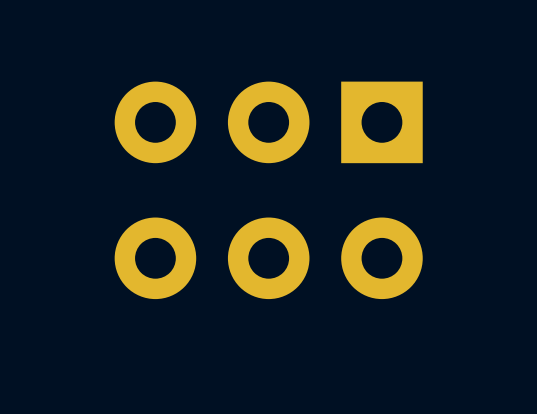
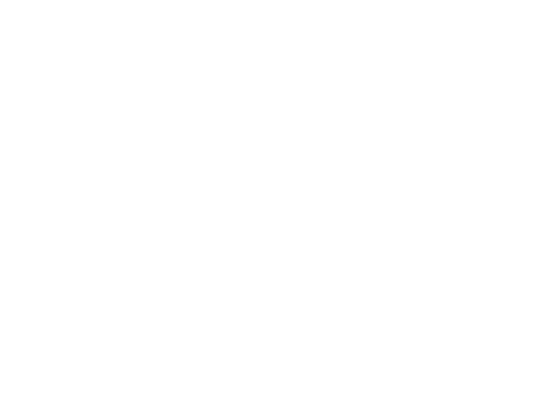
part: (268, 190) -> none

